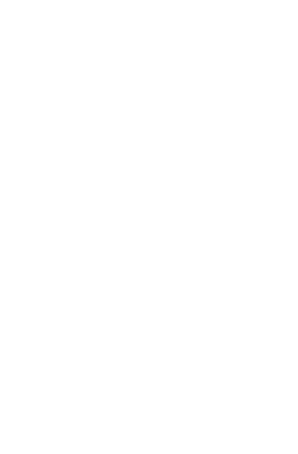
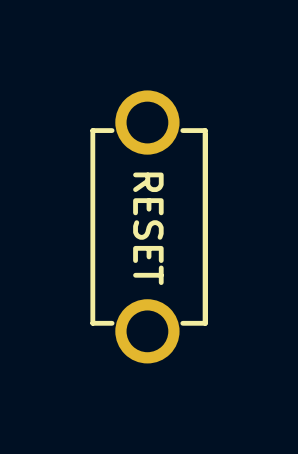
part: none -> (149, 226)

